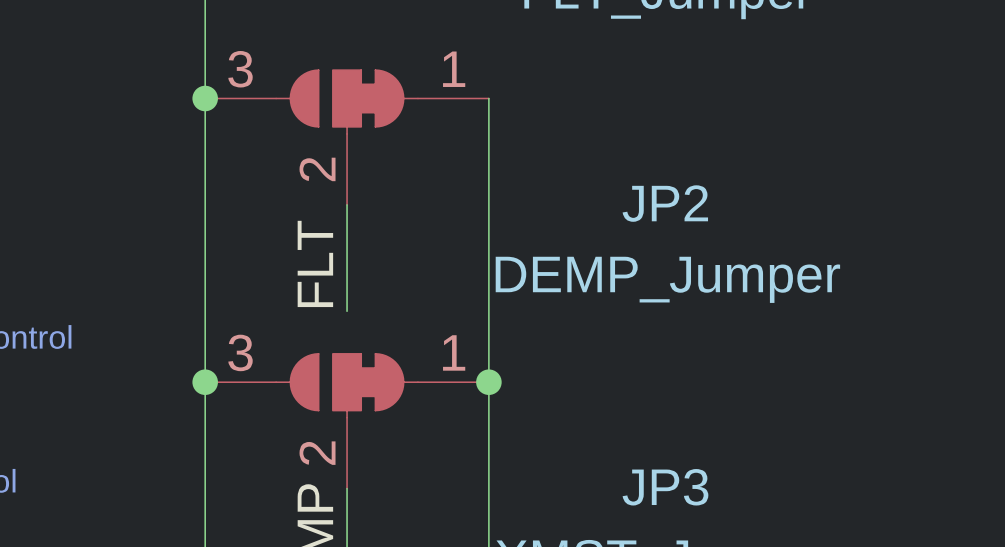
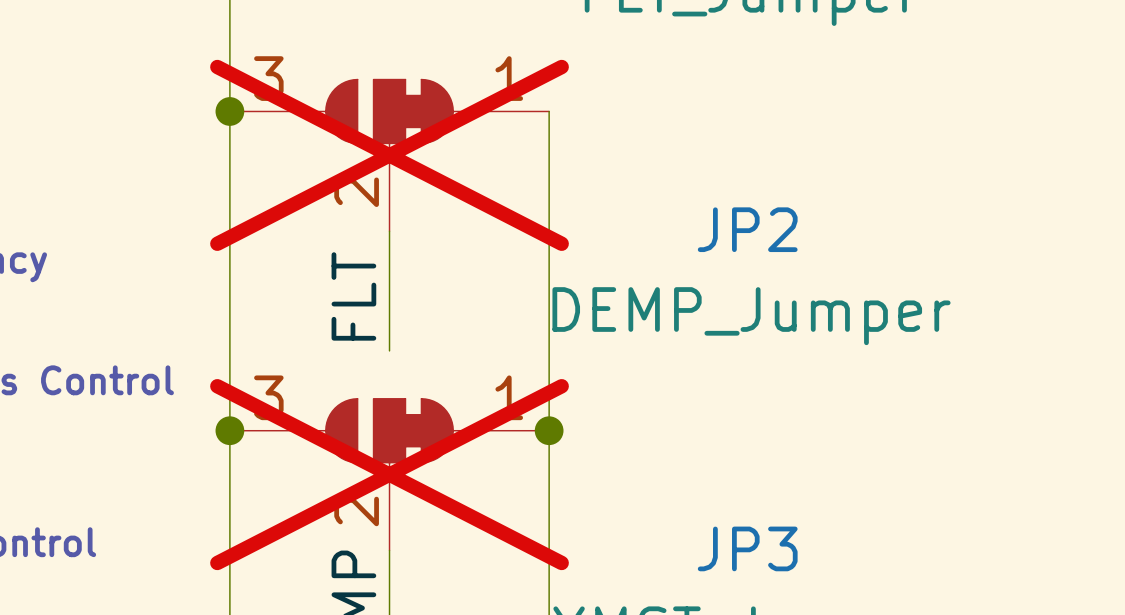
part do-not-place cross: none -> (389, 155)
JP2 do-not-place cross: none -> (389, 474)

